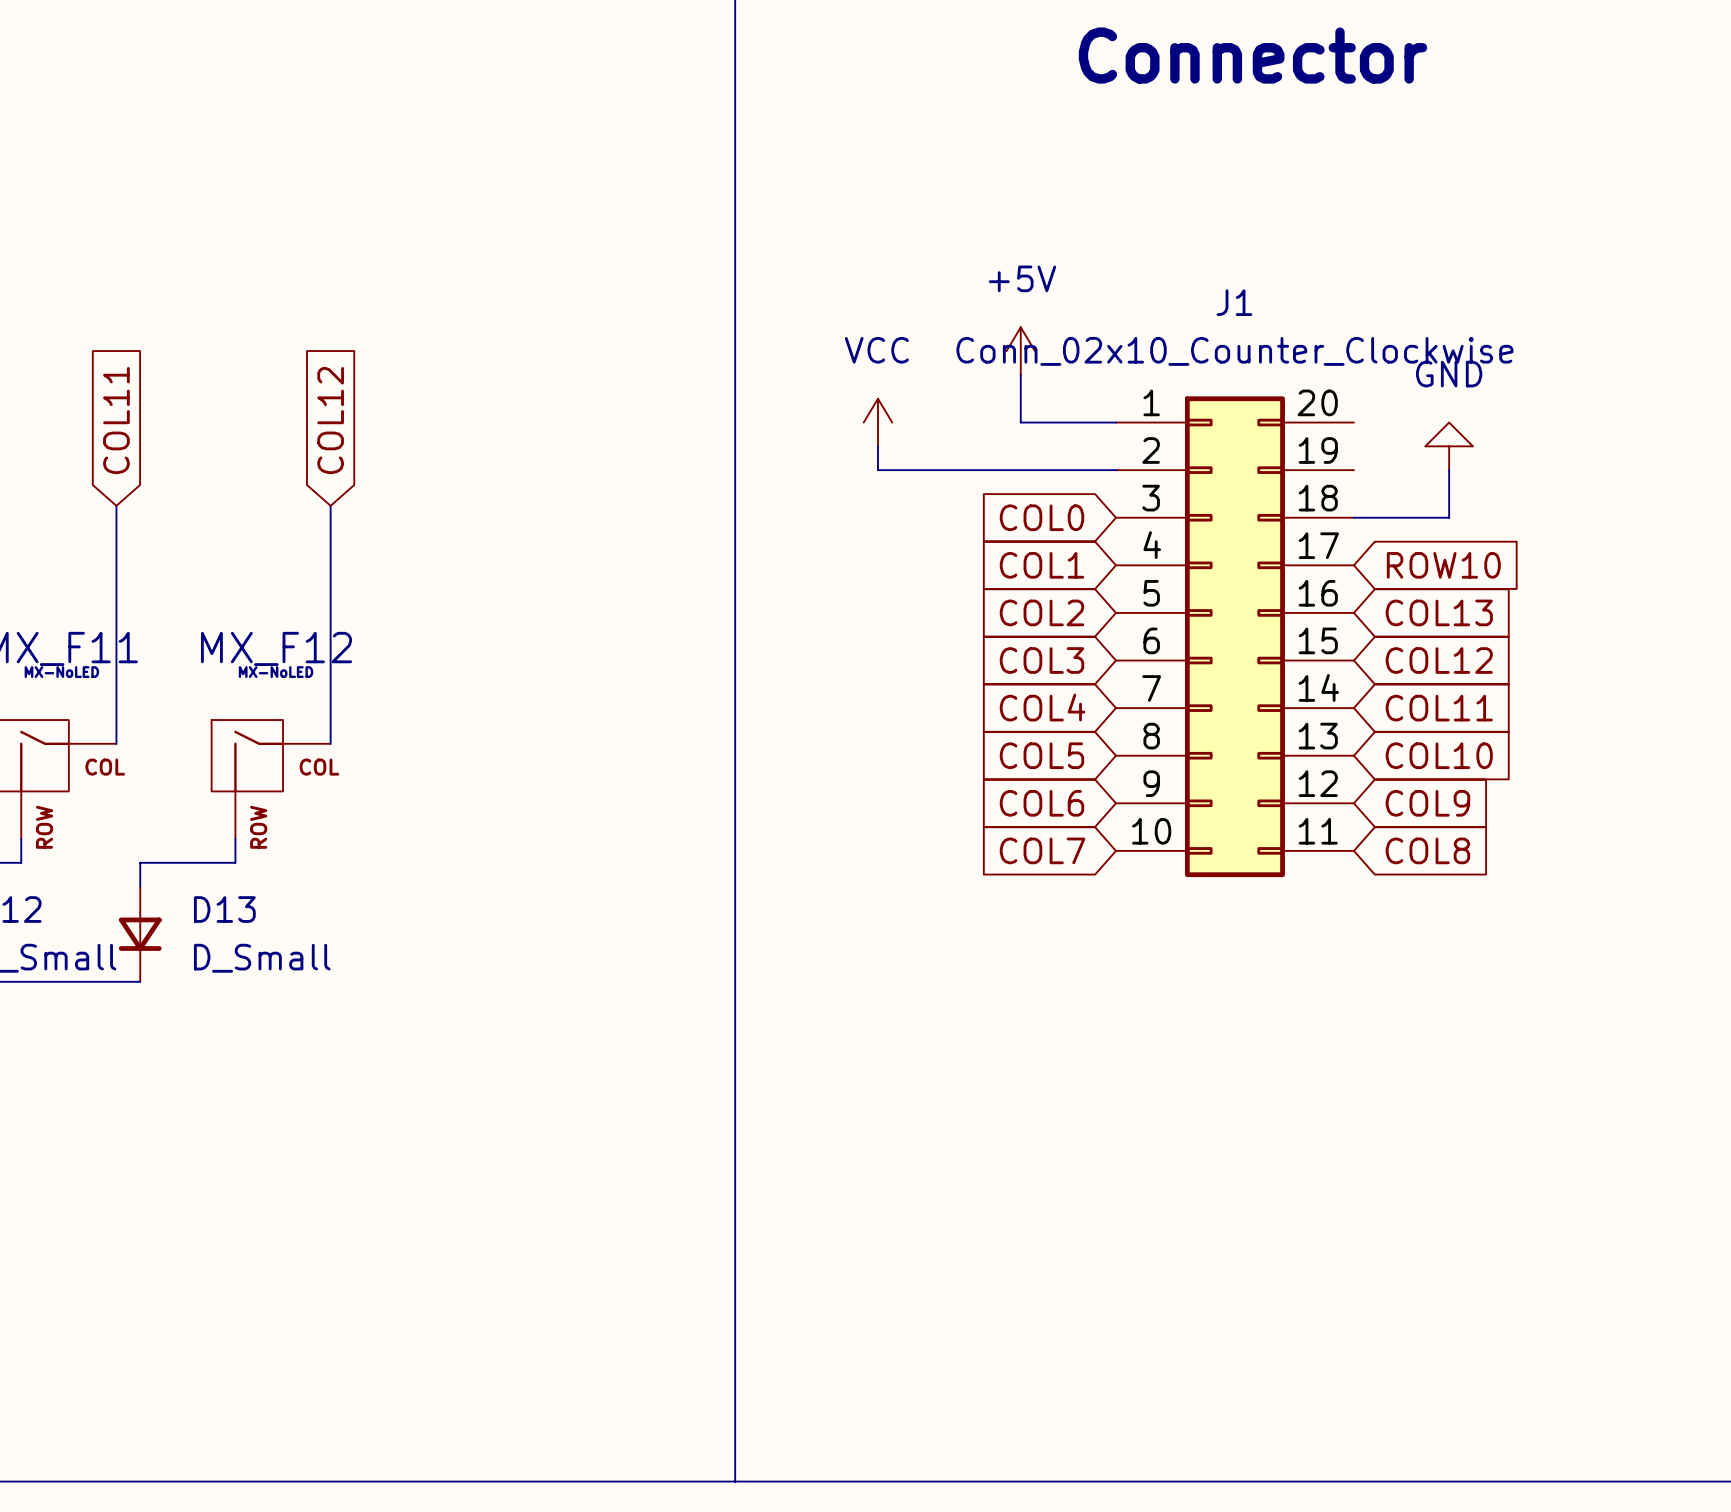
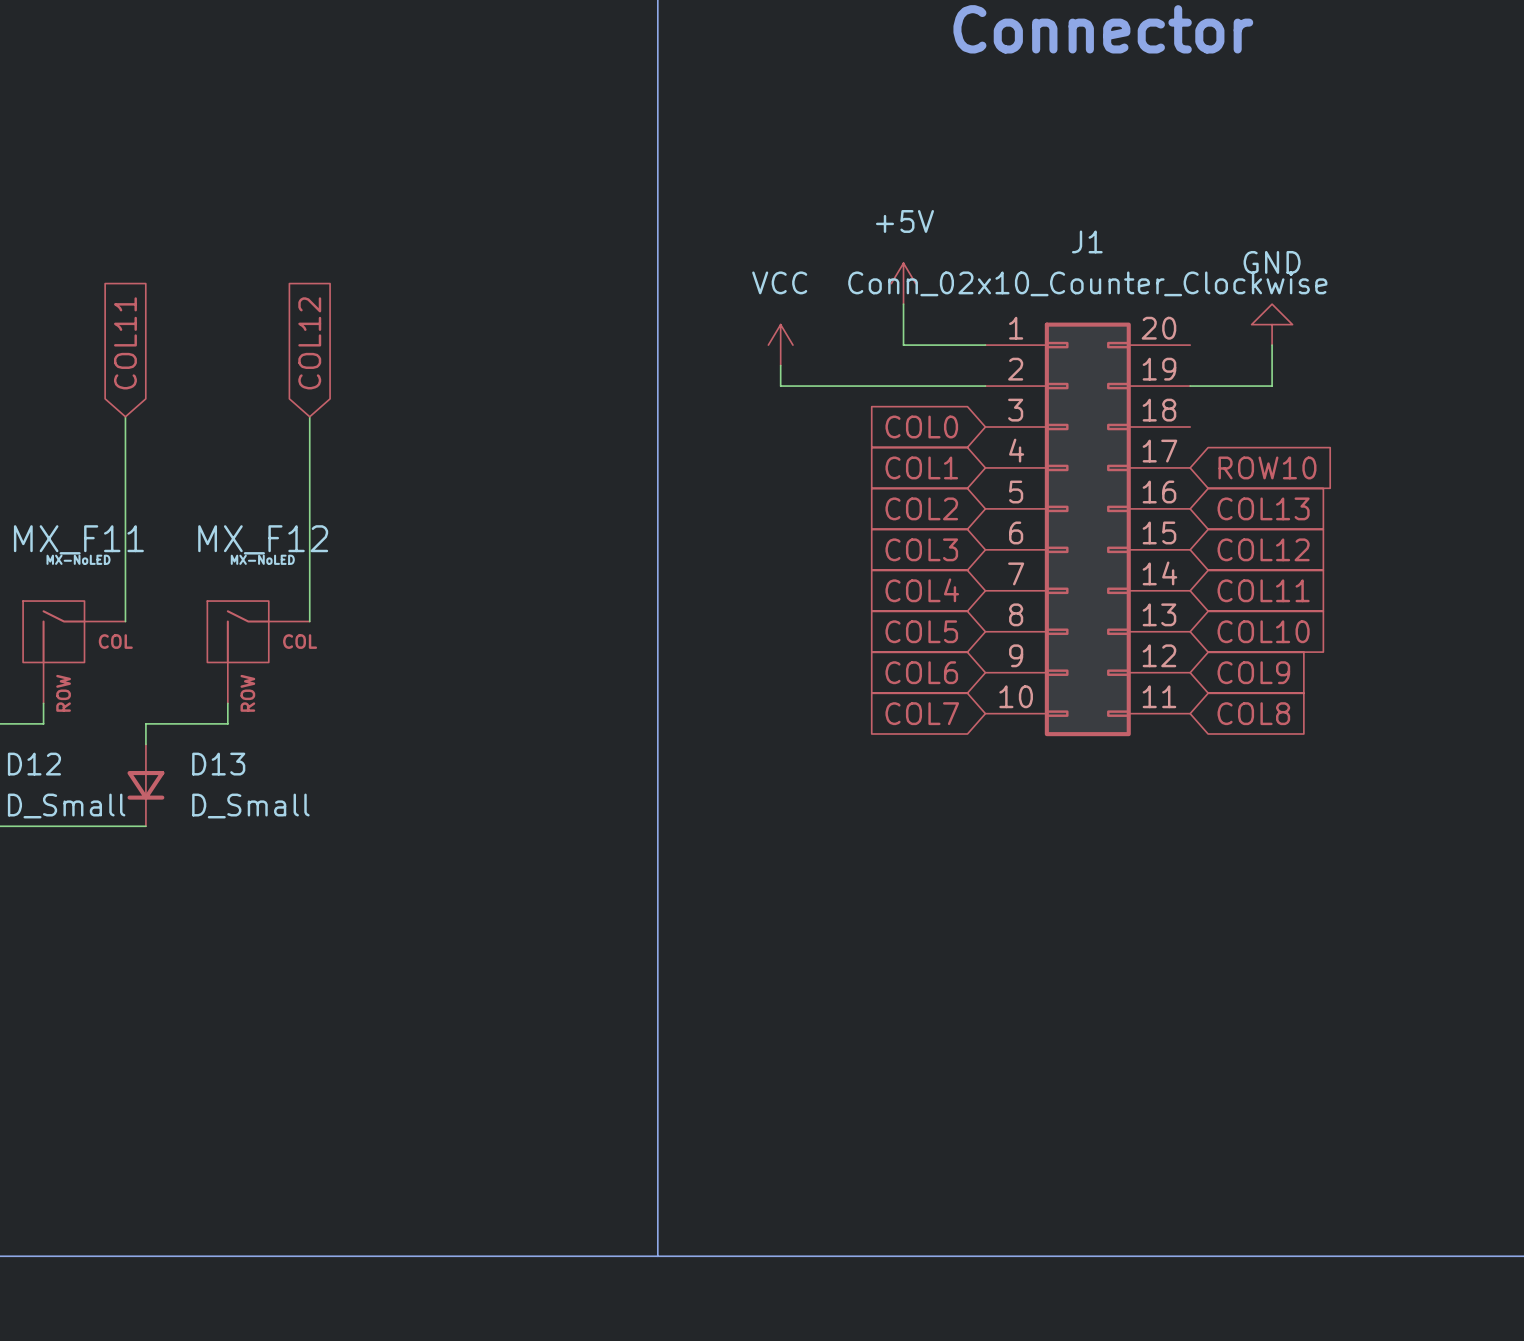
power symbol position: GND (1449, 446) -> GND (1272, 324)
wire: (1449, 470) (1449, 517) (1353, 517) -> (1272, 345) (1272, 386) (1190, 386)

